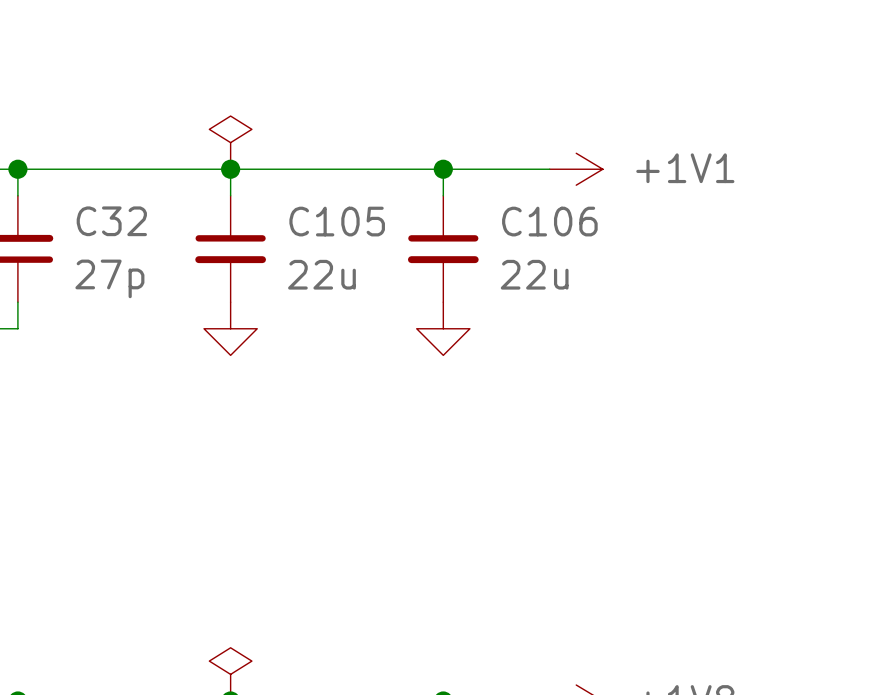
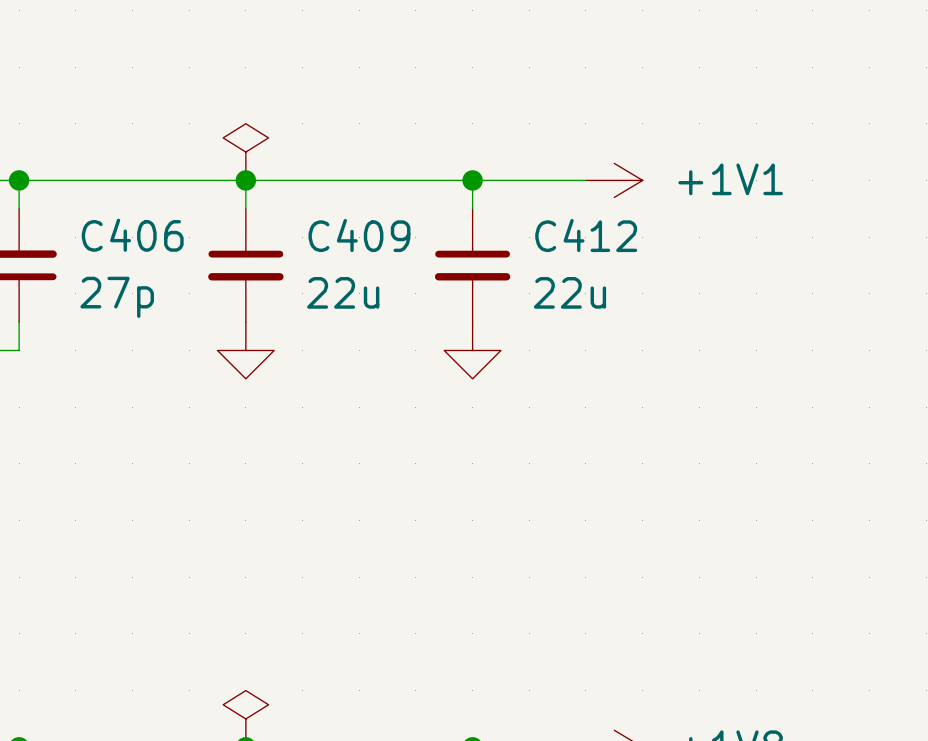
C32 name: C32 (111, 221) -> C406 (132, 235)
C105 name: C105 (337, 221) -> C409 (359, 235)
C106 name: C106 (549, 221) -> C412 (586, 235)

